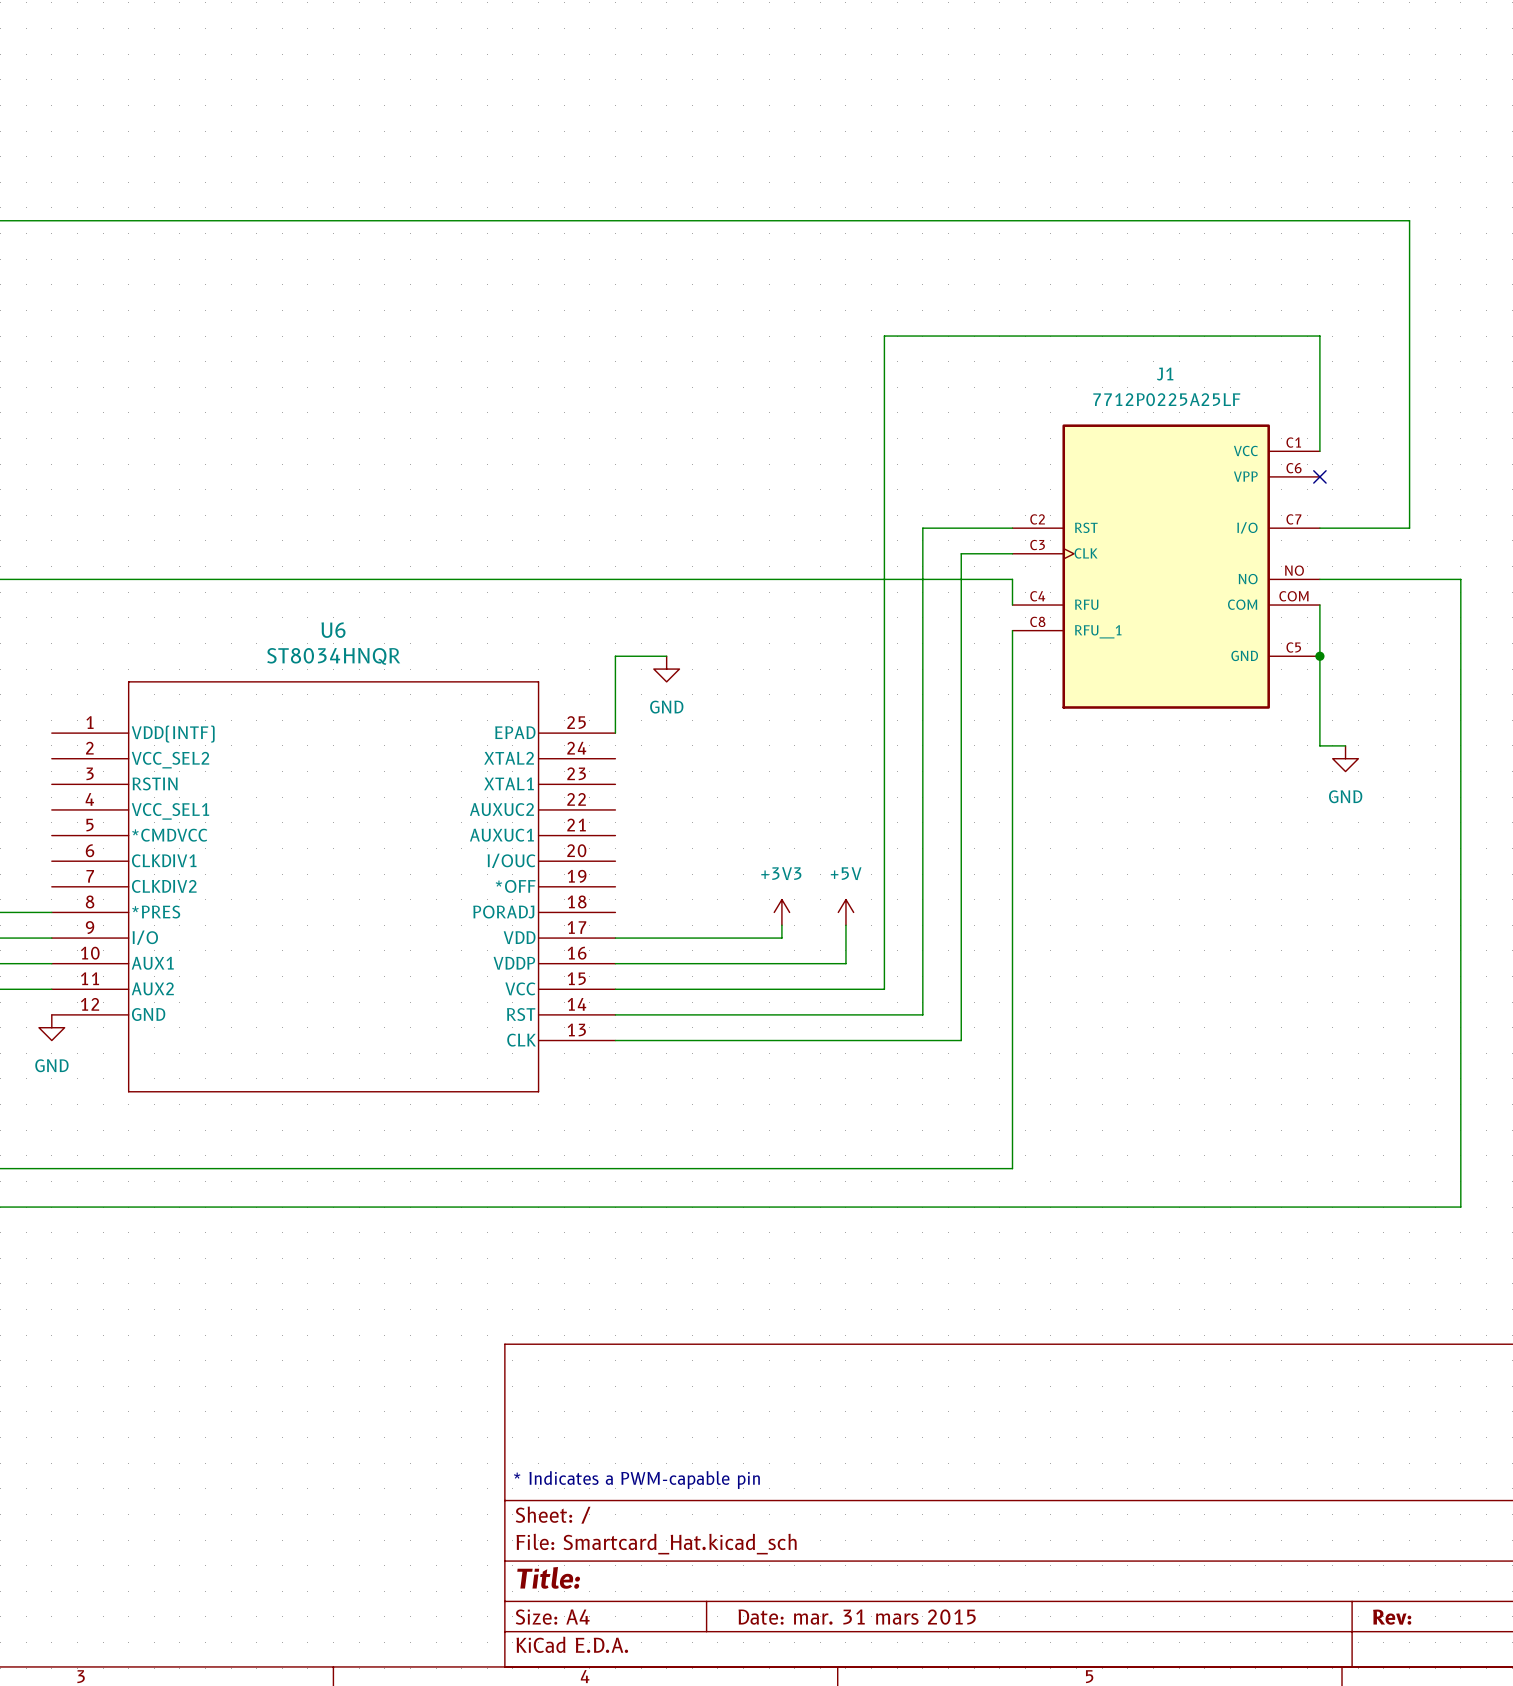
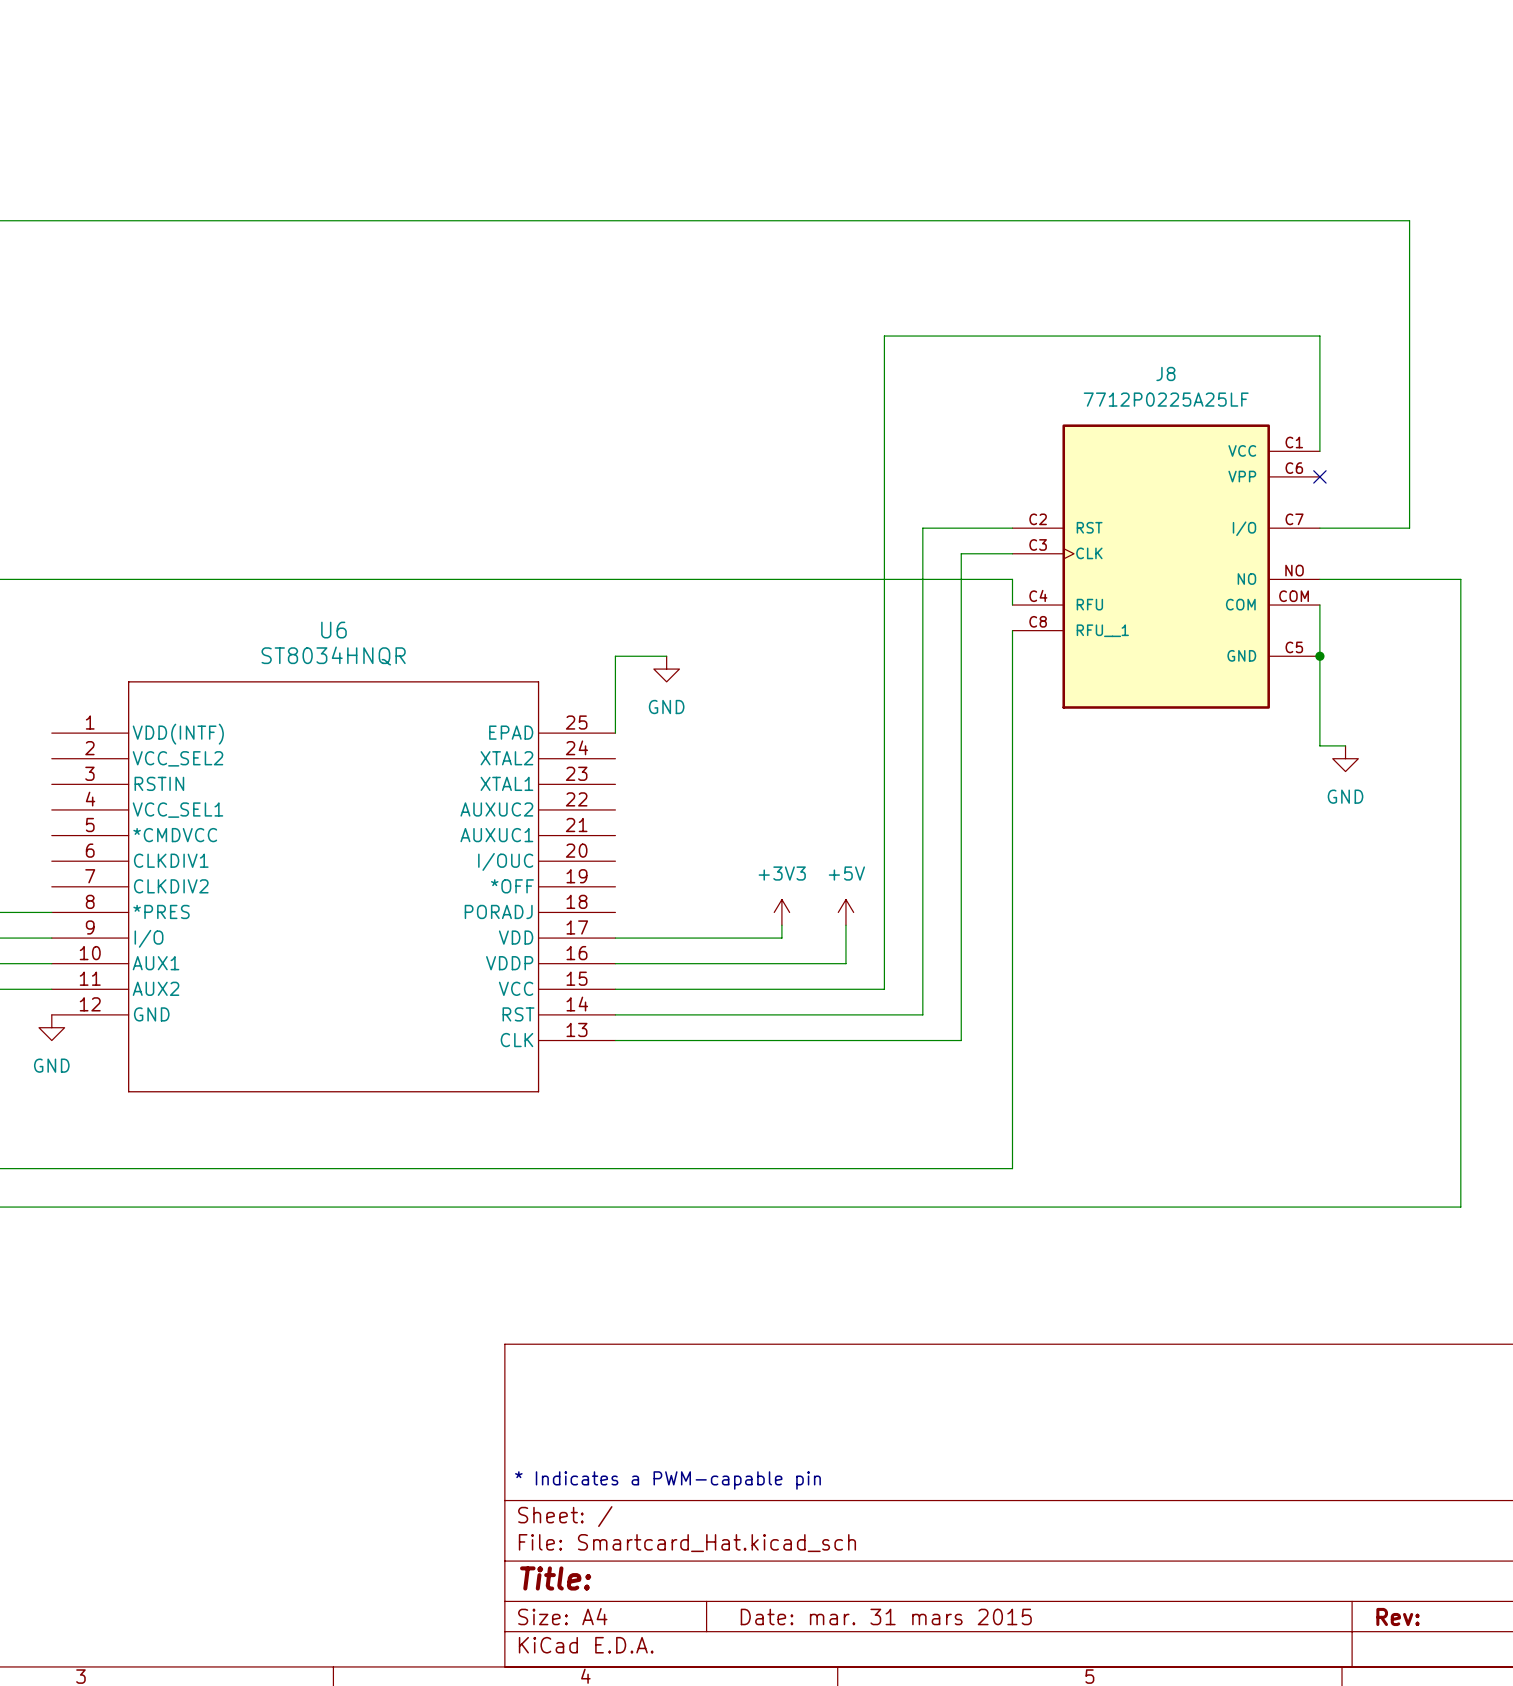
J1 name: J1 (1165, 374) -> J8 (1165, 373)

